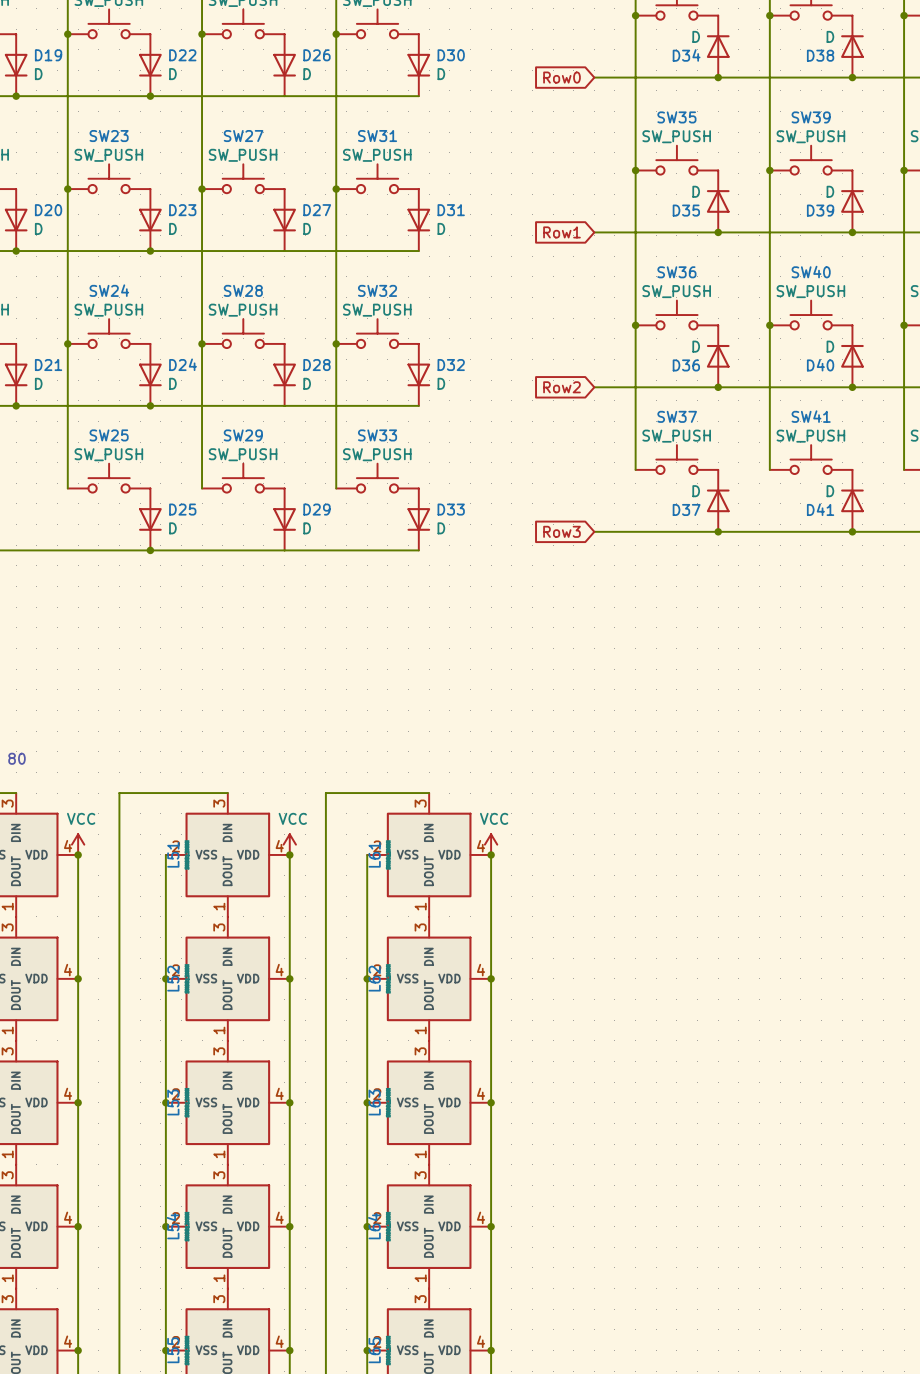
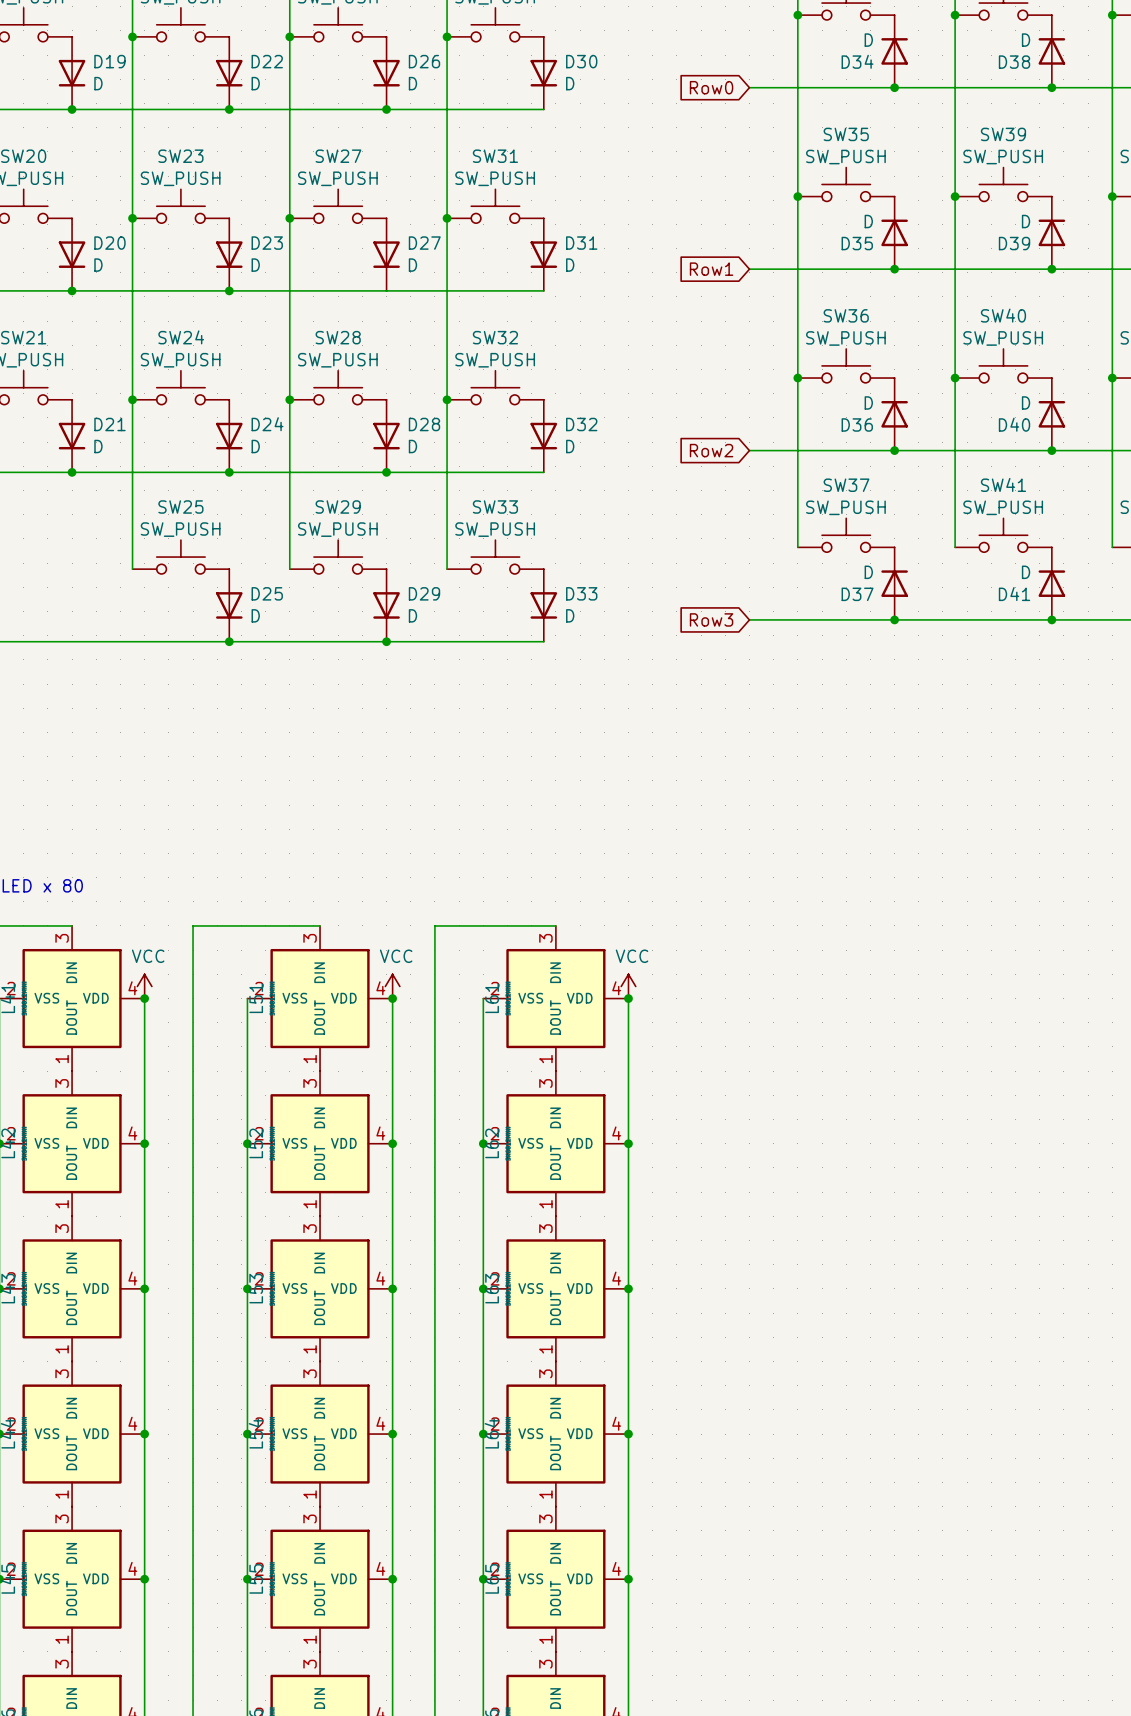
junction: none -> (386, 109)
junction: none -> (386, 472)
junction: none -> (386, 641)

